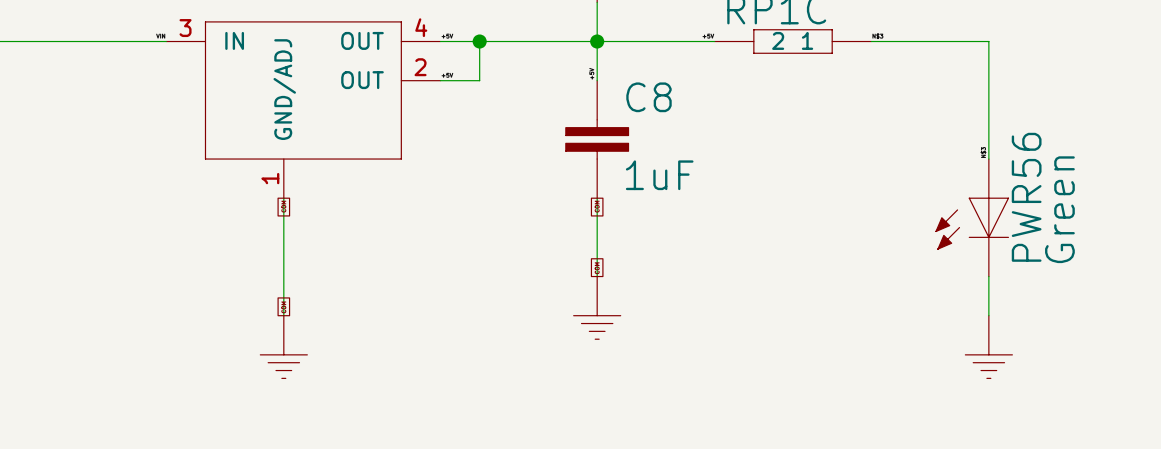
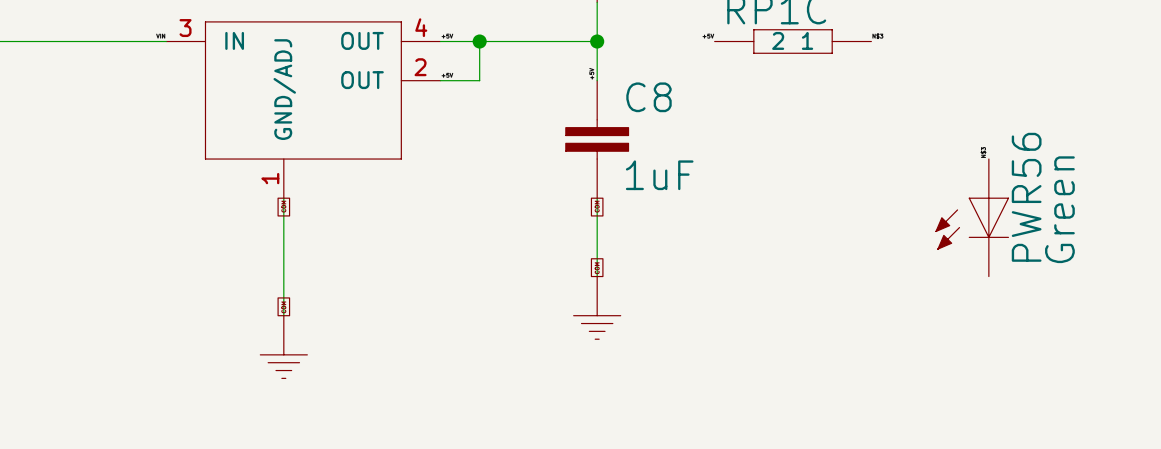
wire: (597, 41) (714, 41) -> none
wire: (871, 41) (988, 41) (988, 159) -> none
wire: (988, 276) (988, 315) -> none
power symbol: (988, 347) -> none

